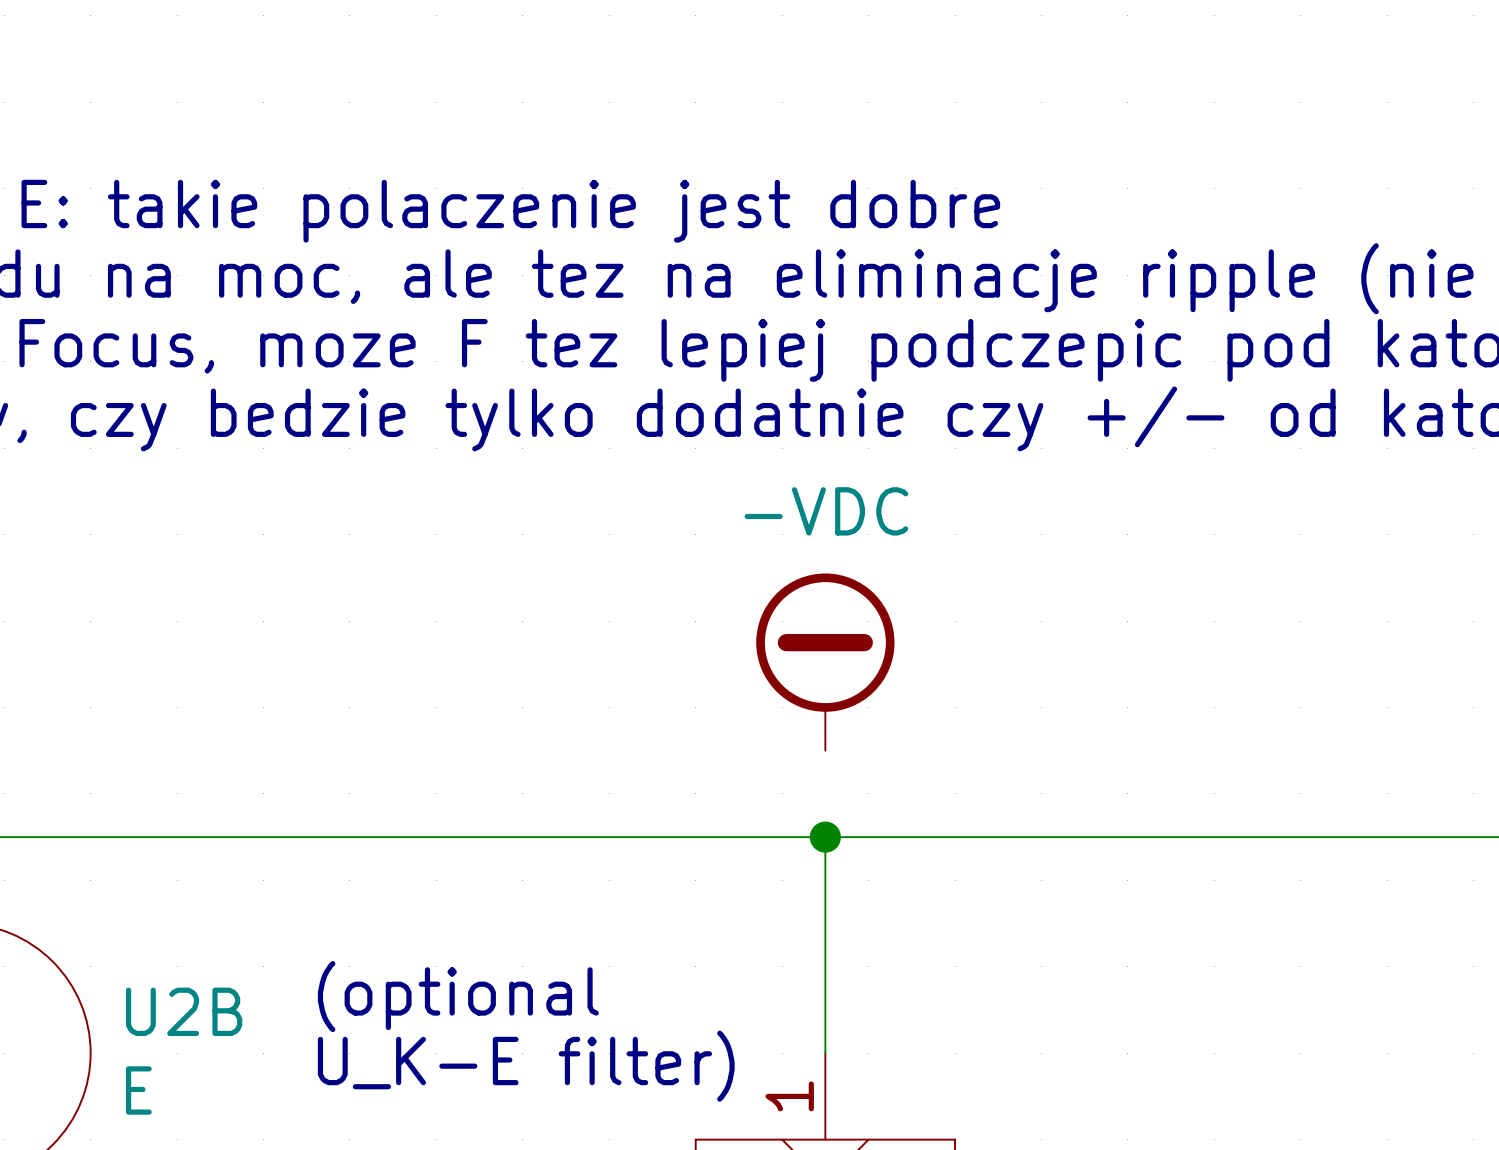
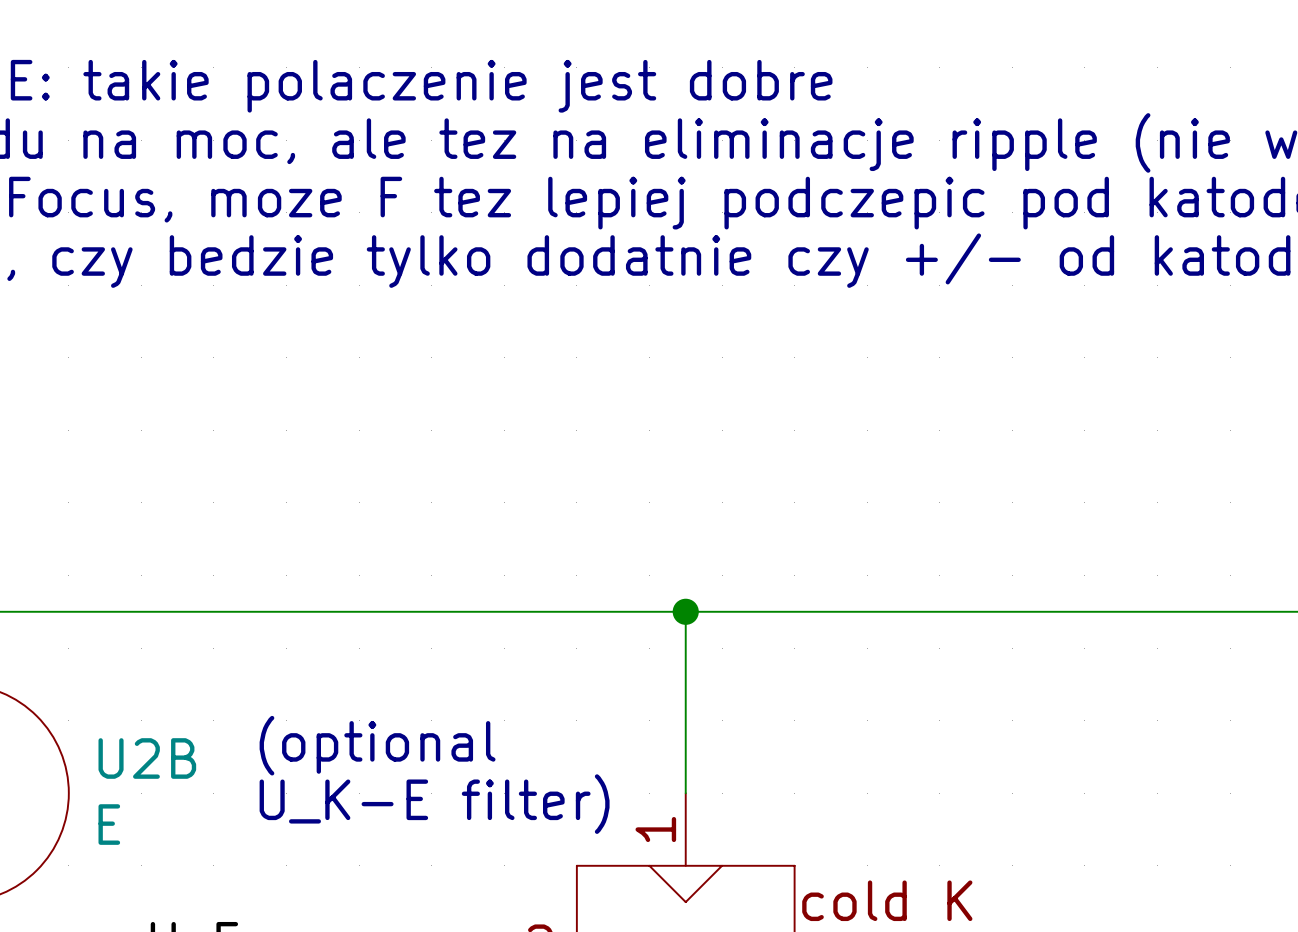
power symbol: -VDC (825, 662) -> none

